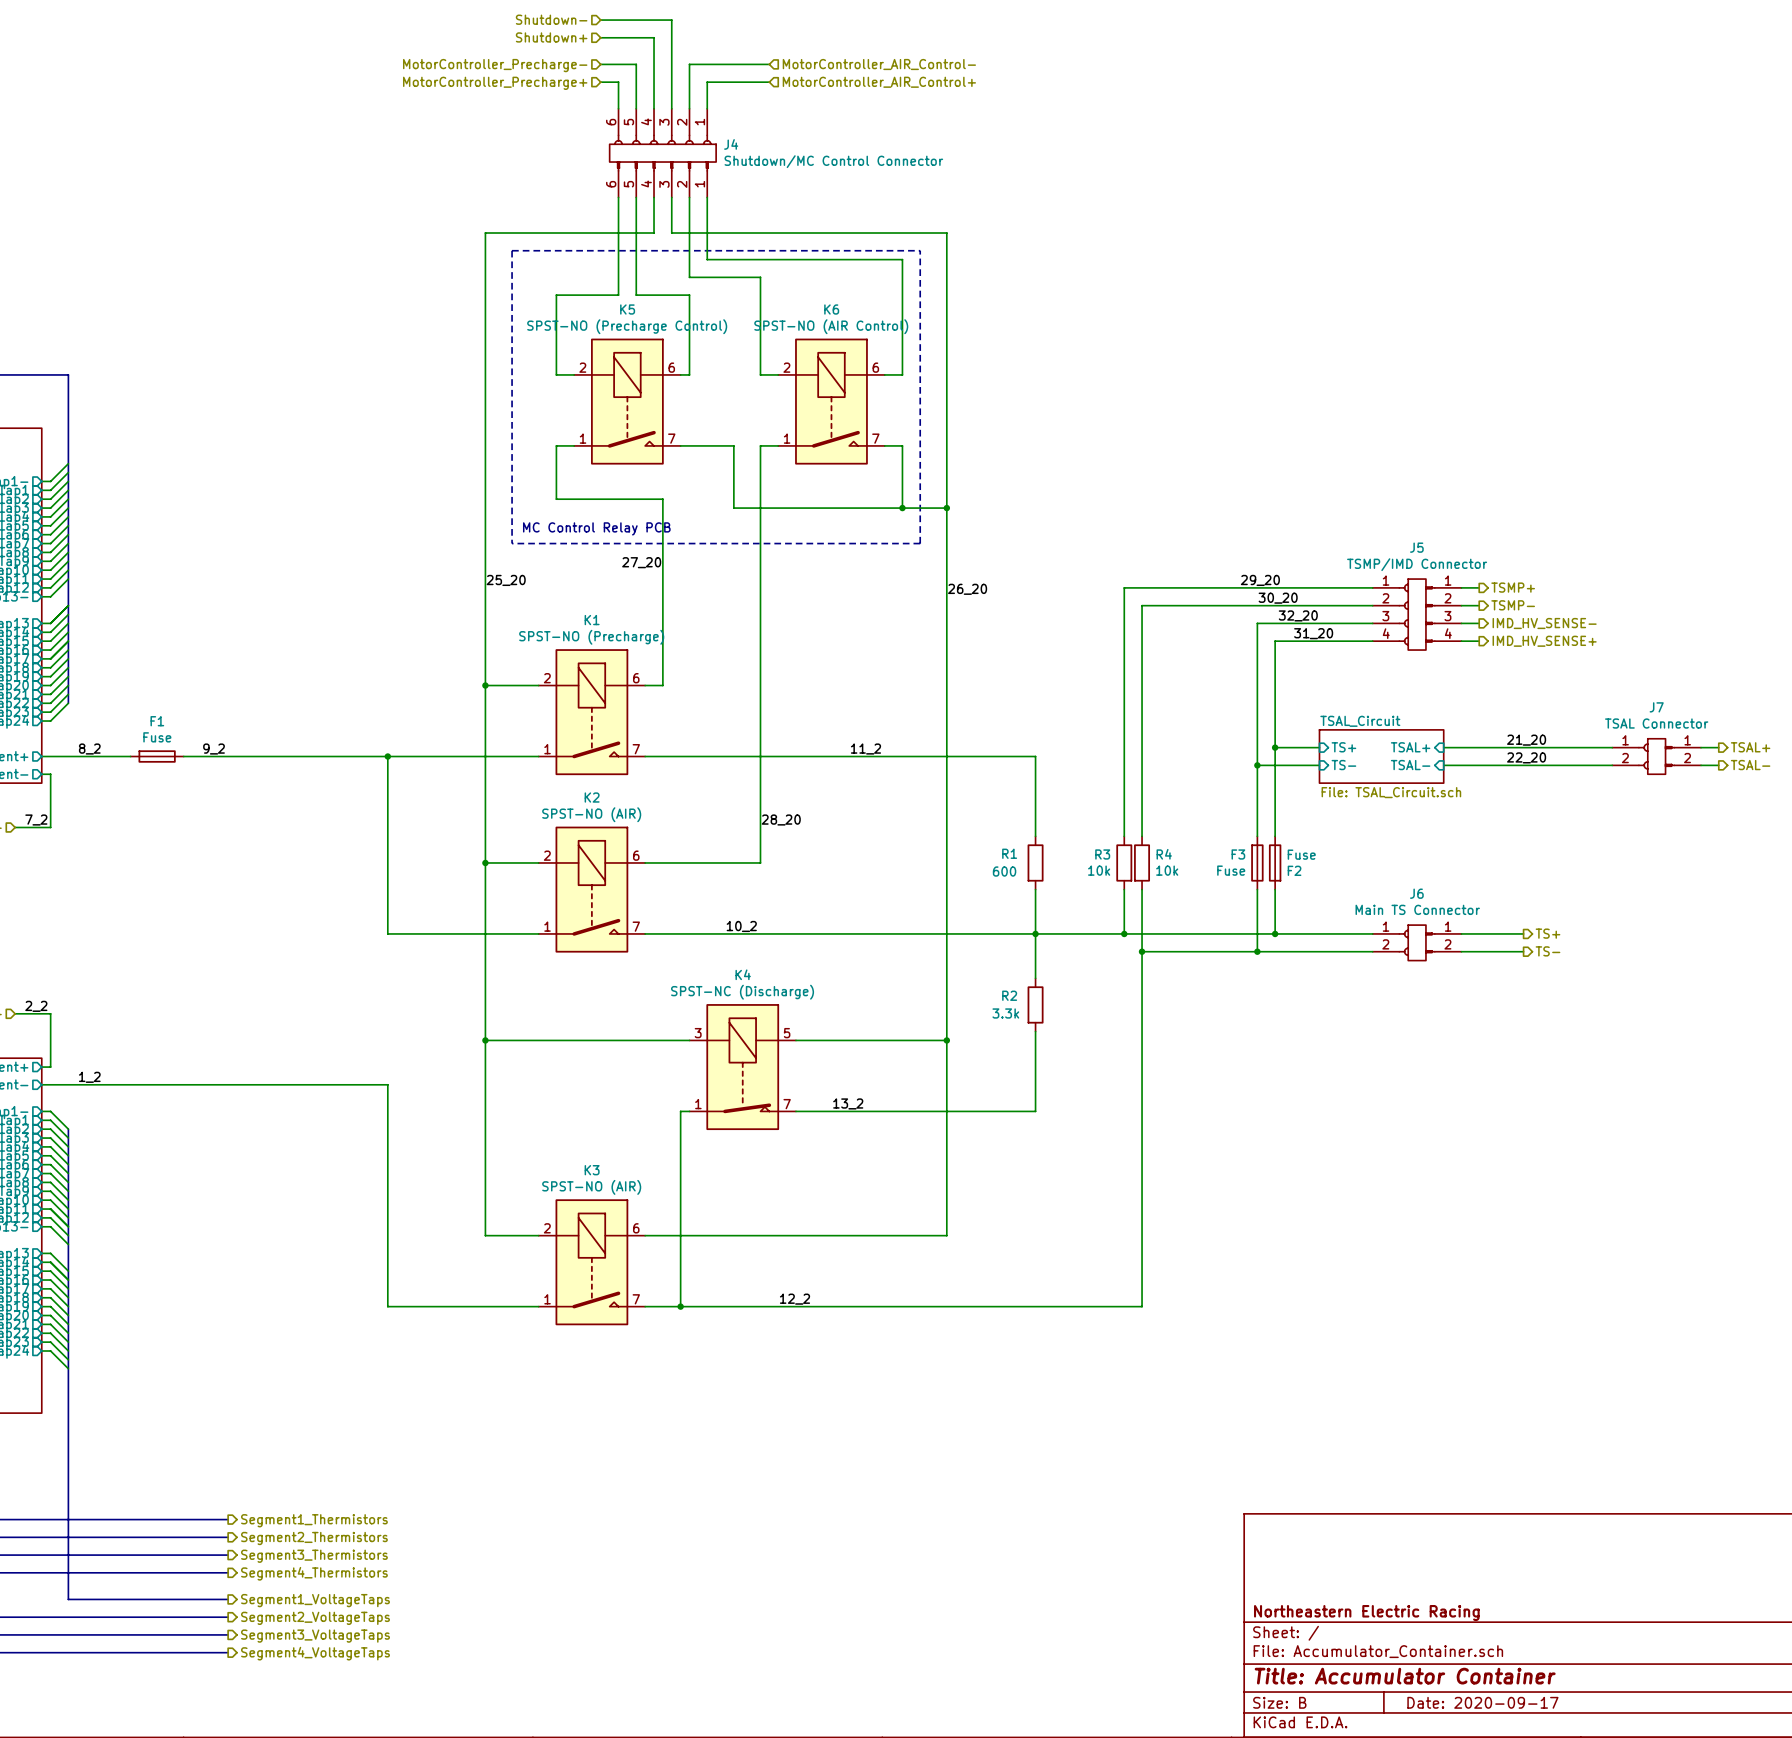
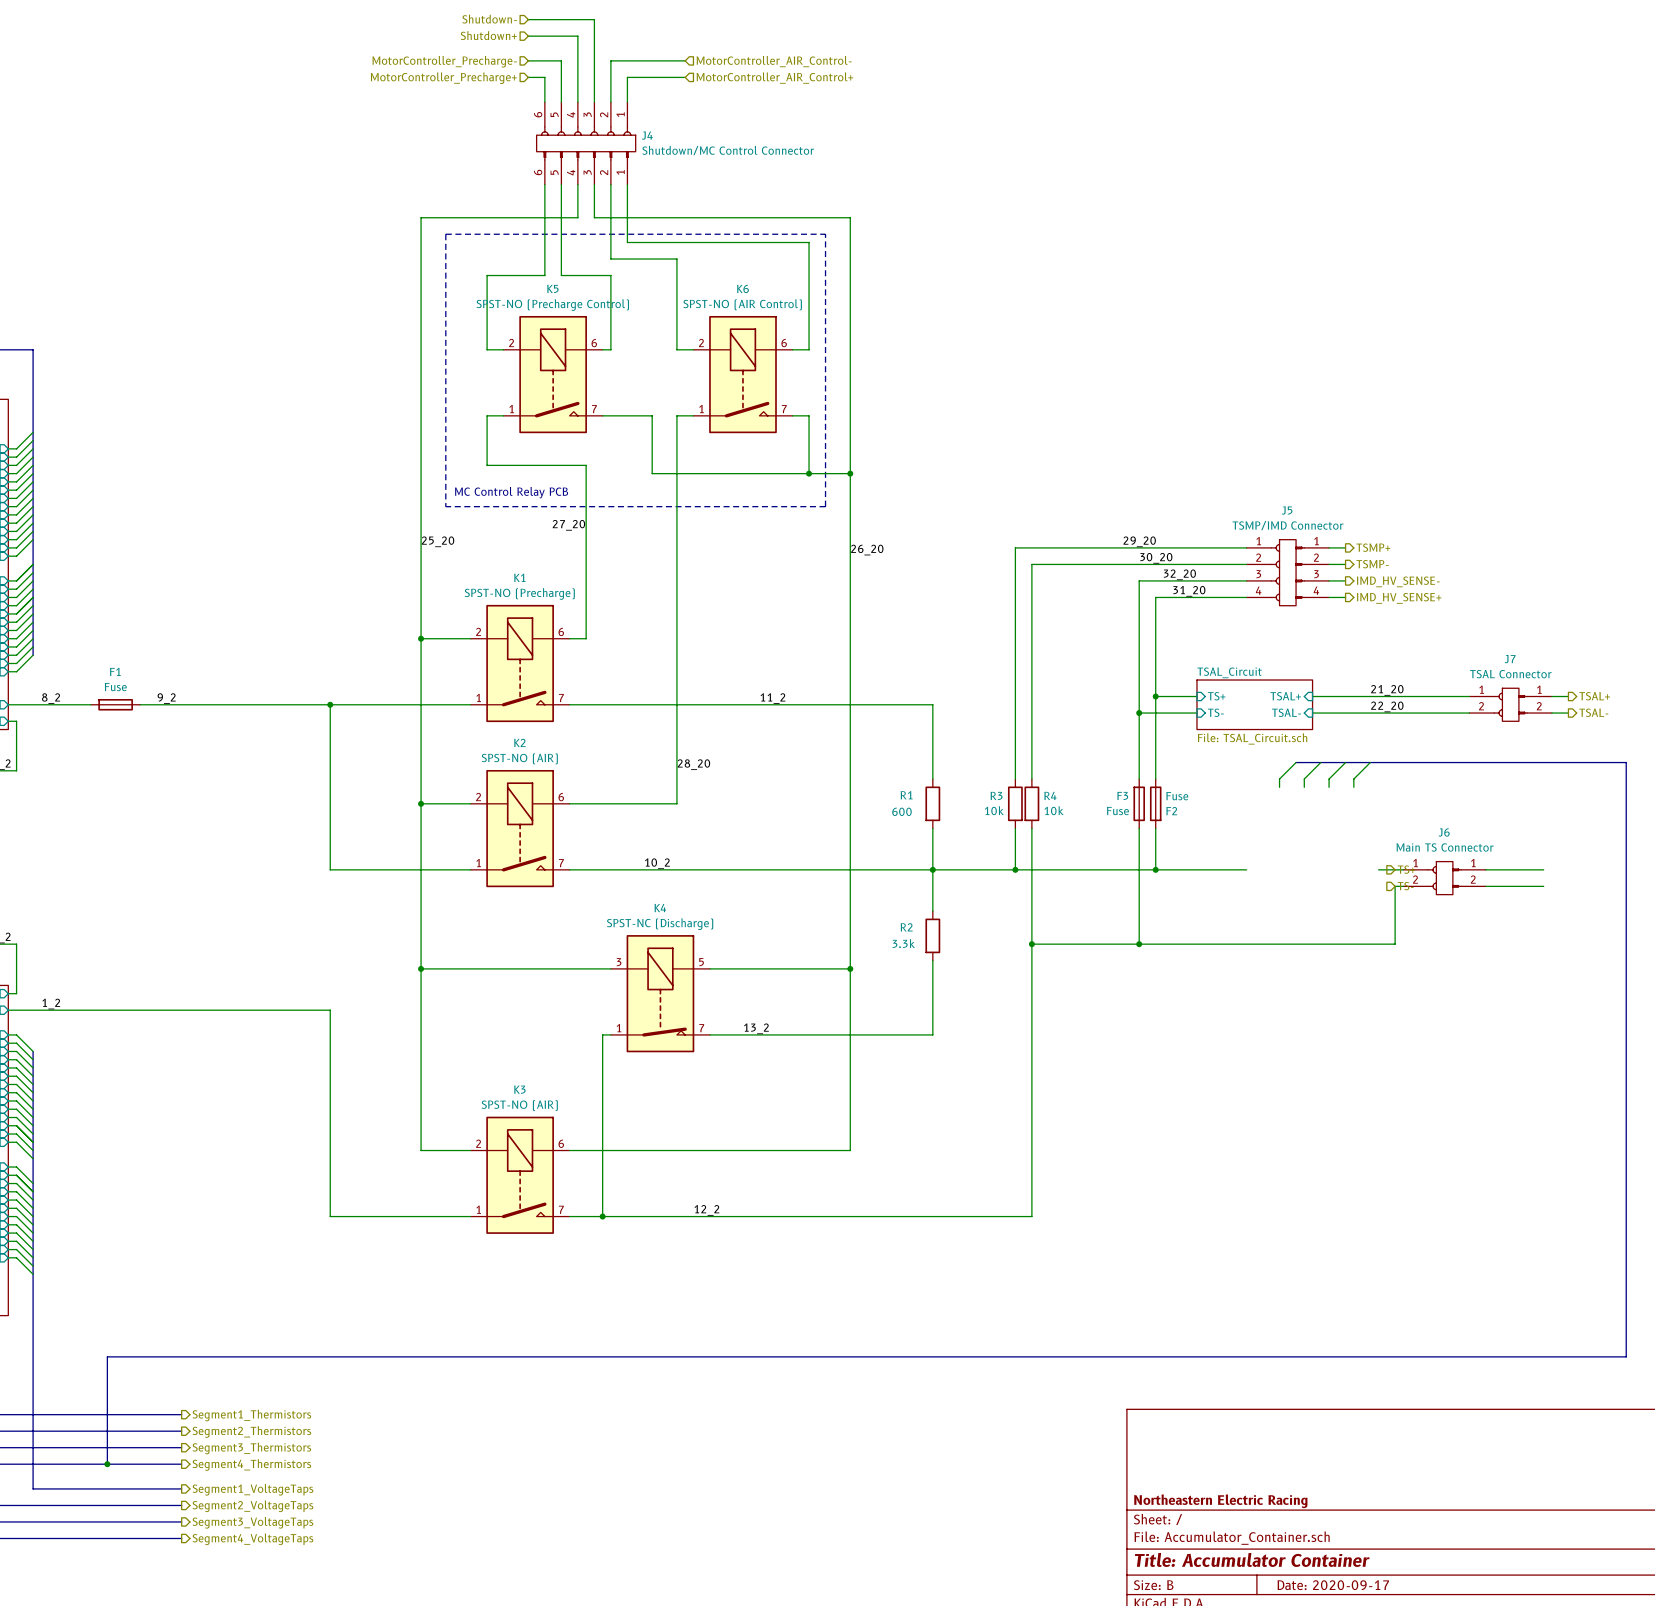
wire: none -> (1296, 762) (1279, 779) (1279, 787)
bus: none -> (1296, 762) (1626, 762) (1626, 1356) (107, 1356) (107, 1464)
wire: none -> (1320, 762) (1304, 779) (1304, 787)
wire: none -> (1345, 762) (1329, 779) (1329, 787)
wire: none -> (1370, 762) (1353, 779) (1353, 787)
wire: (1461, 933) (1514, 933) -> none
wire: none -> (1386, 869) (1403, 869)
wire: none -> (1485, 869) (1543, 869)
J6 position: (1417, 942) -> (1444, 878)
wire: (1142, 951) (1372, 951) -> none
junction: (1142, 951) -> none
wire: none -> (1139, 886) (1139, 944)
junction: (1257, 951) -> none
wire: (1461, 951) (1523, 951) -> (1485, 886) (1543, 886)
wire: none -> (1403, 886) (1395, 886) (1395, 944) (1031, 944)
junction: none -> (1031, 944)
junction: none -> (1139, 944)
junction: none -> (107, 1464)

